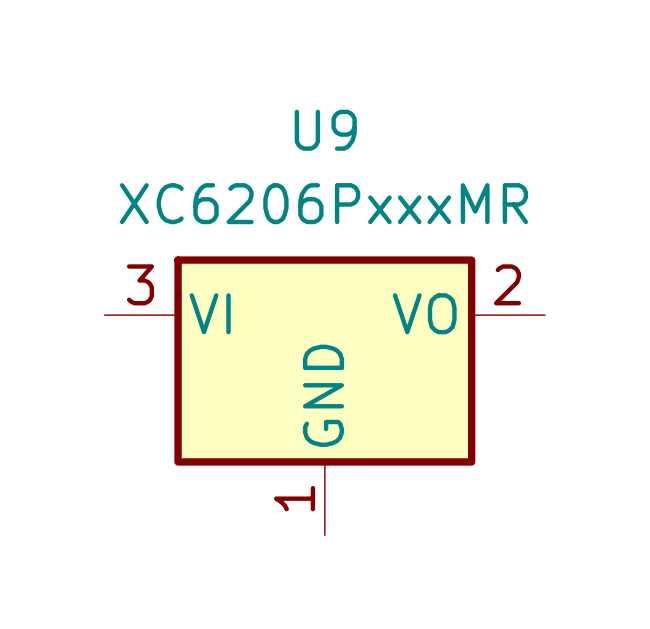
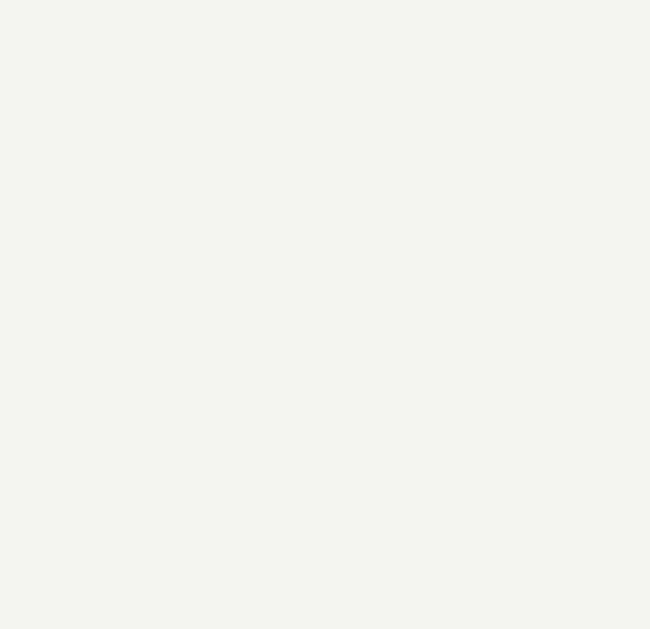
U9: XC6206PxxxMR (324, 395) -> none

